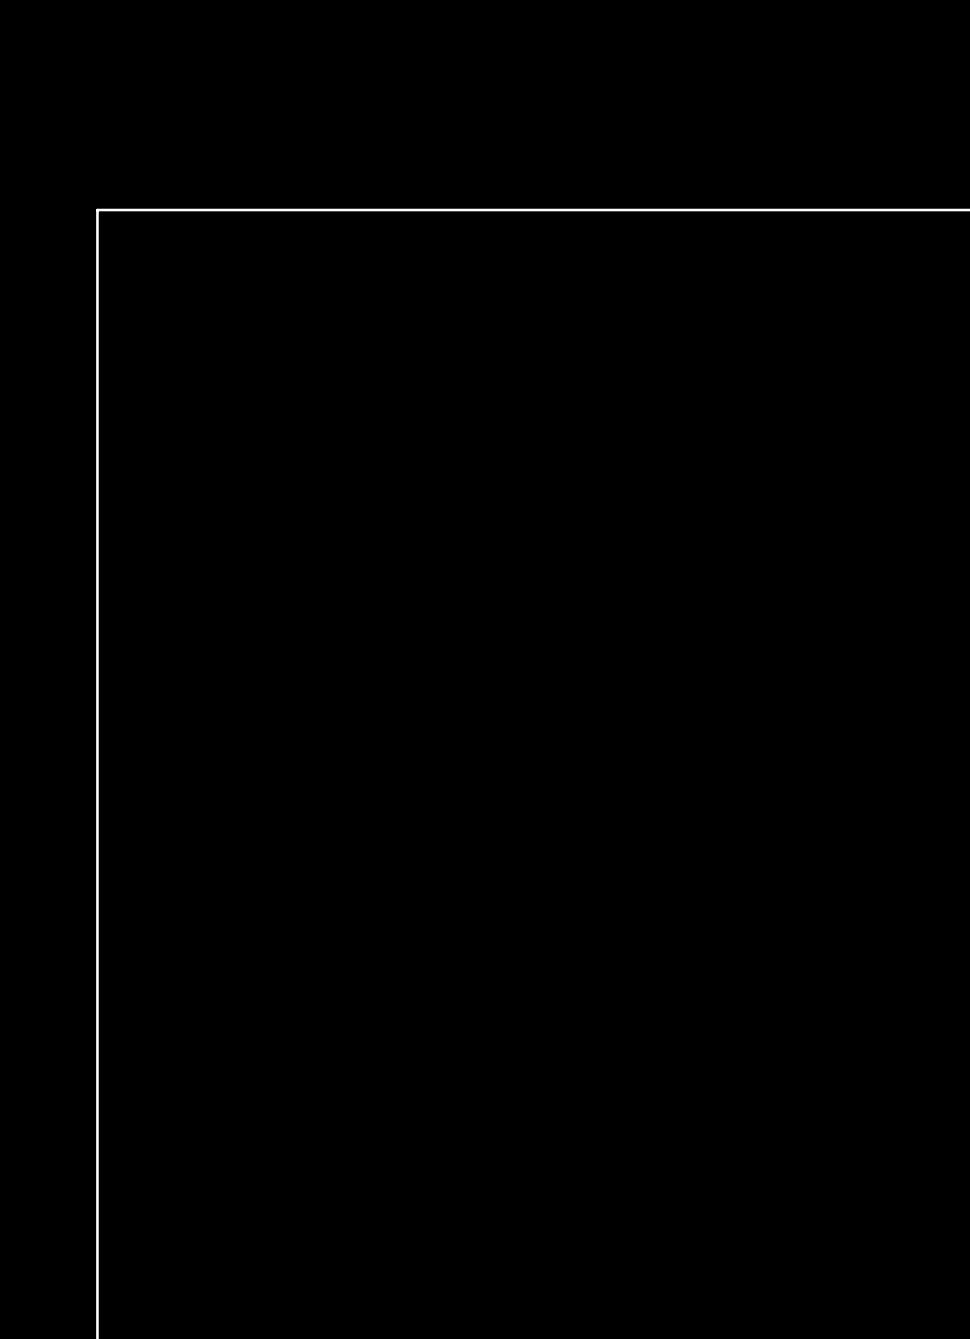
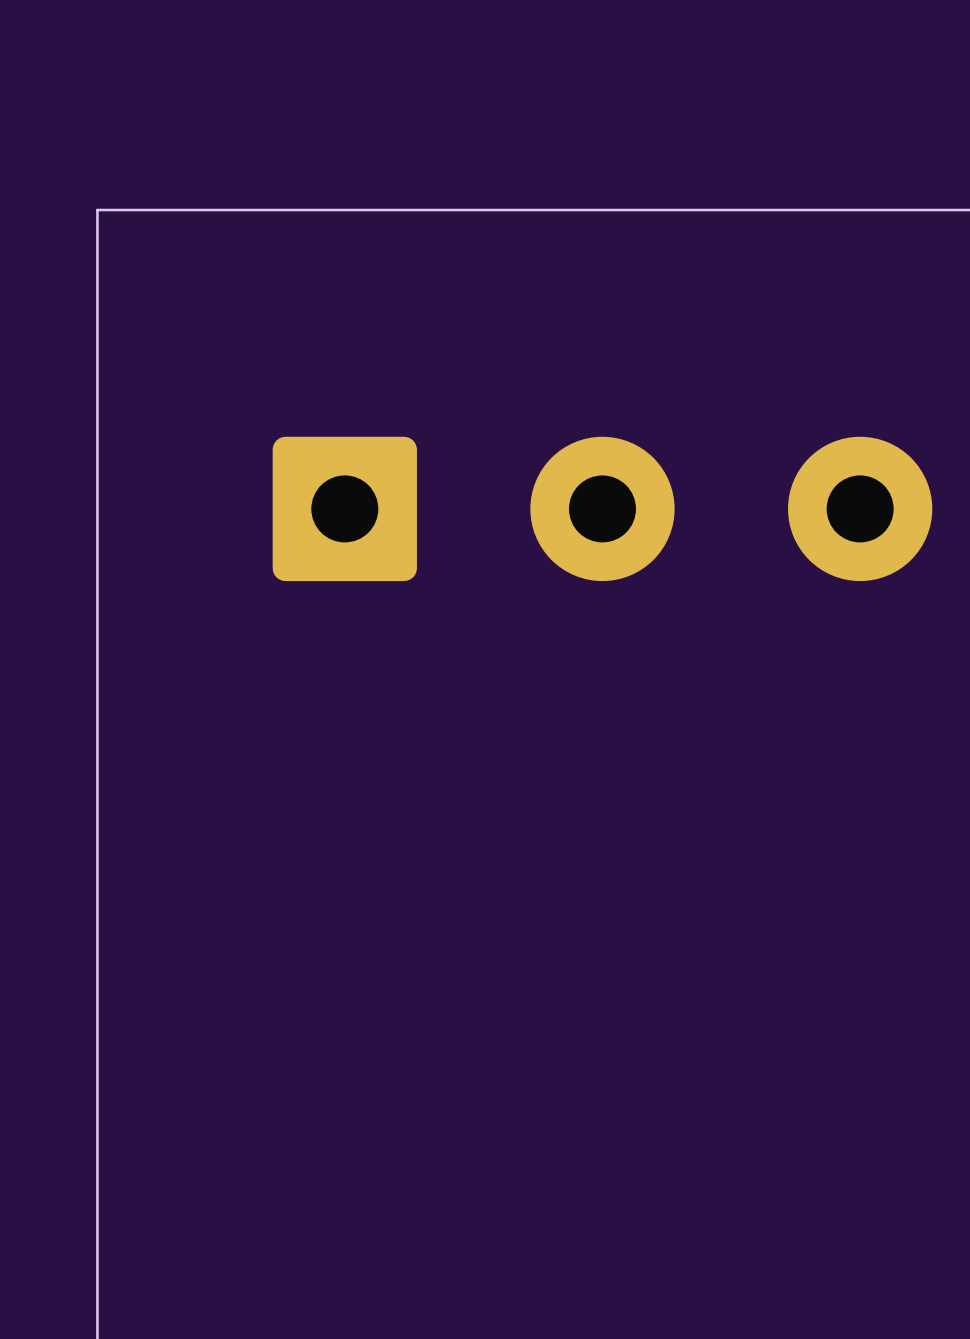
part: none -> (602, 508)

